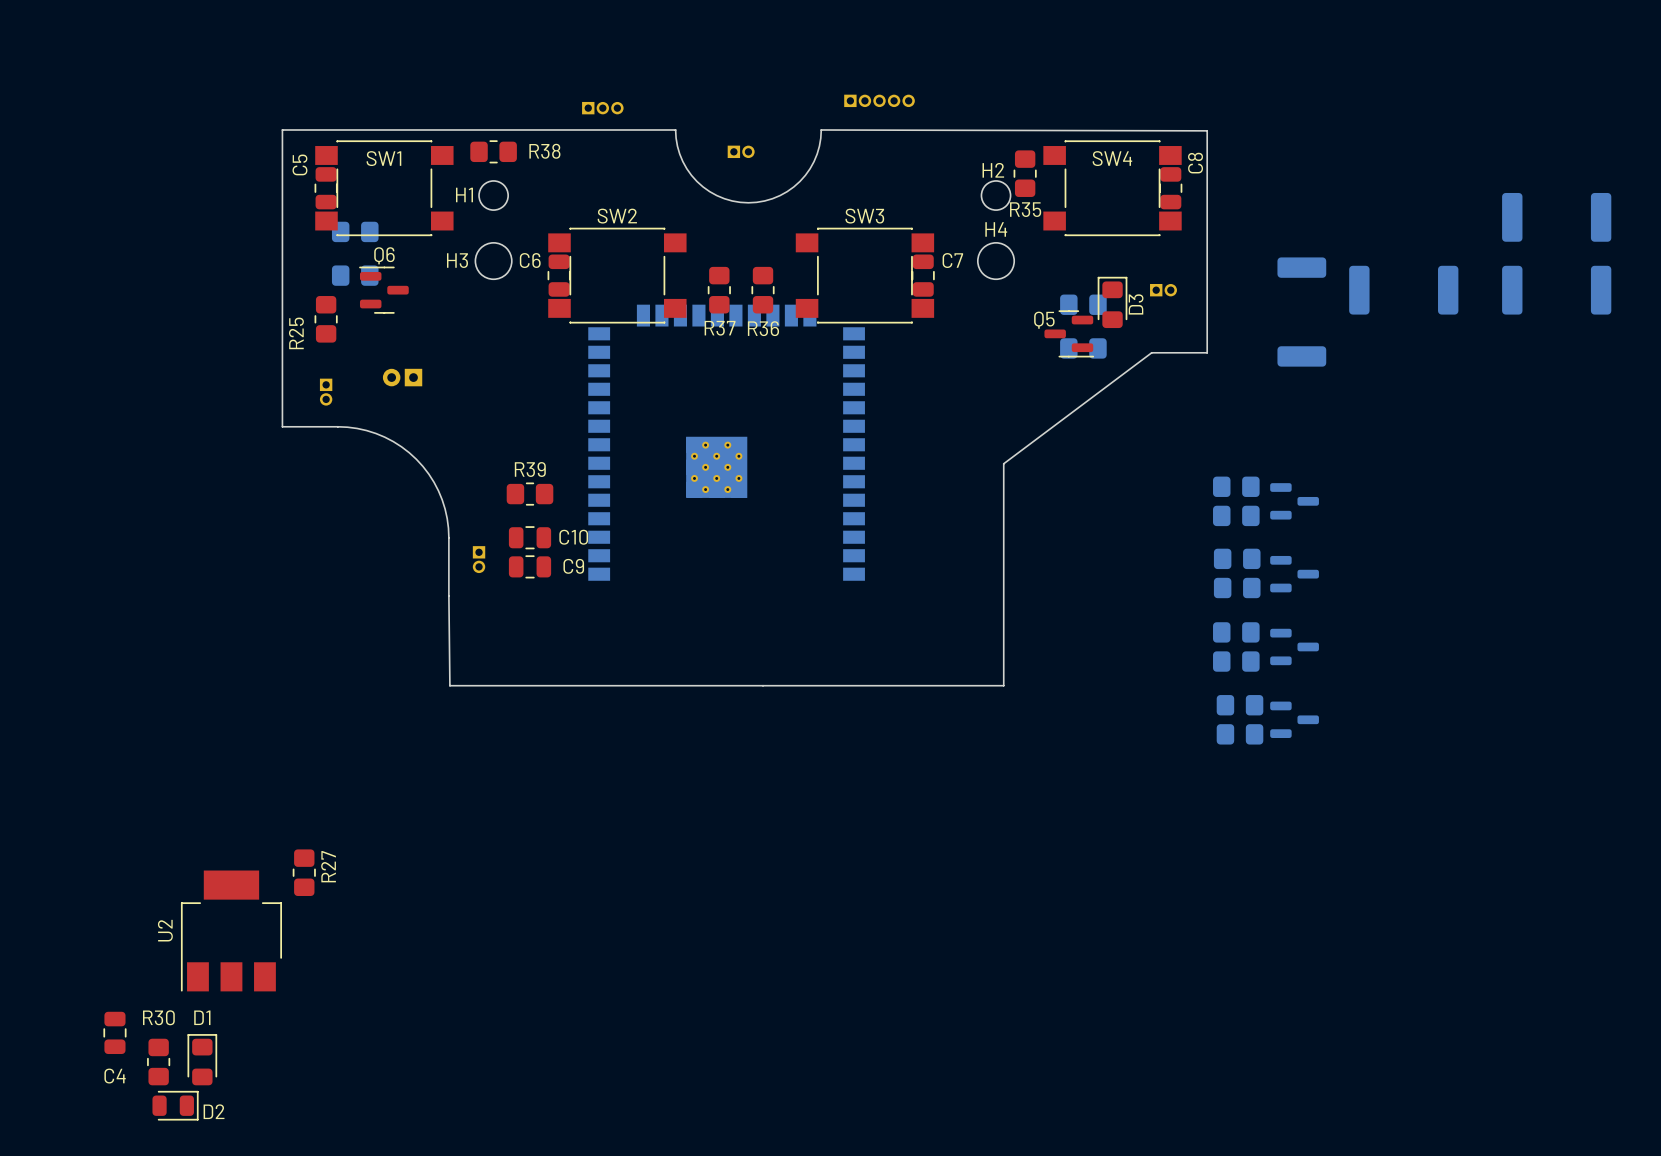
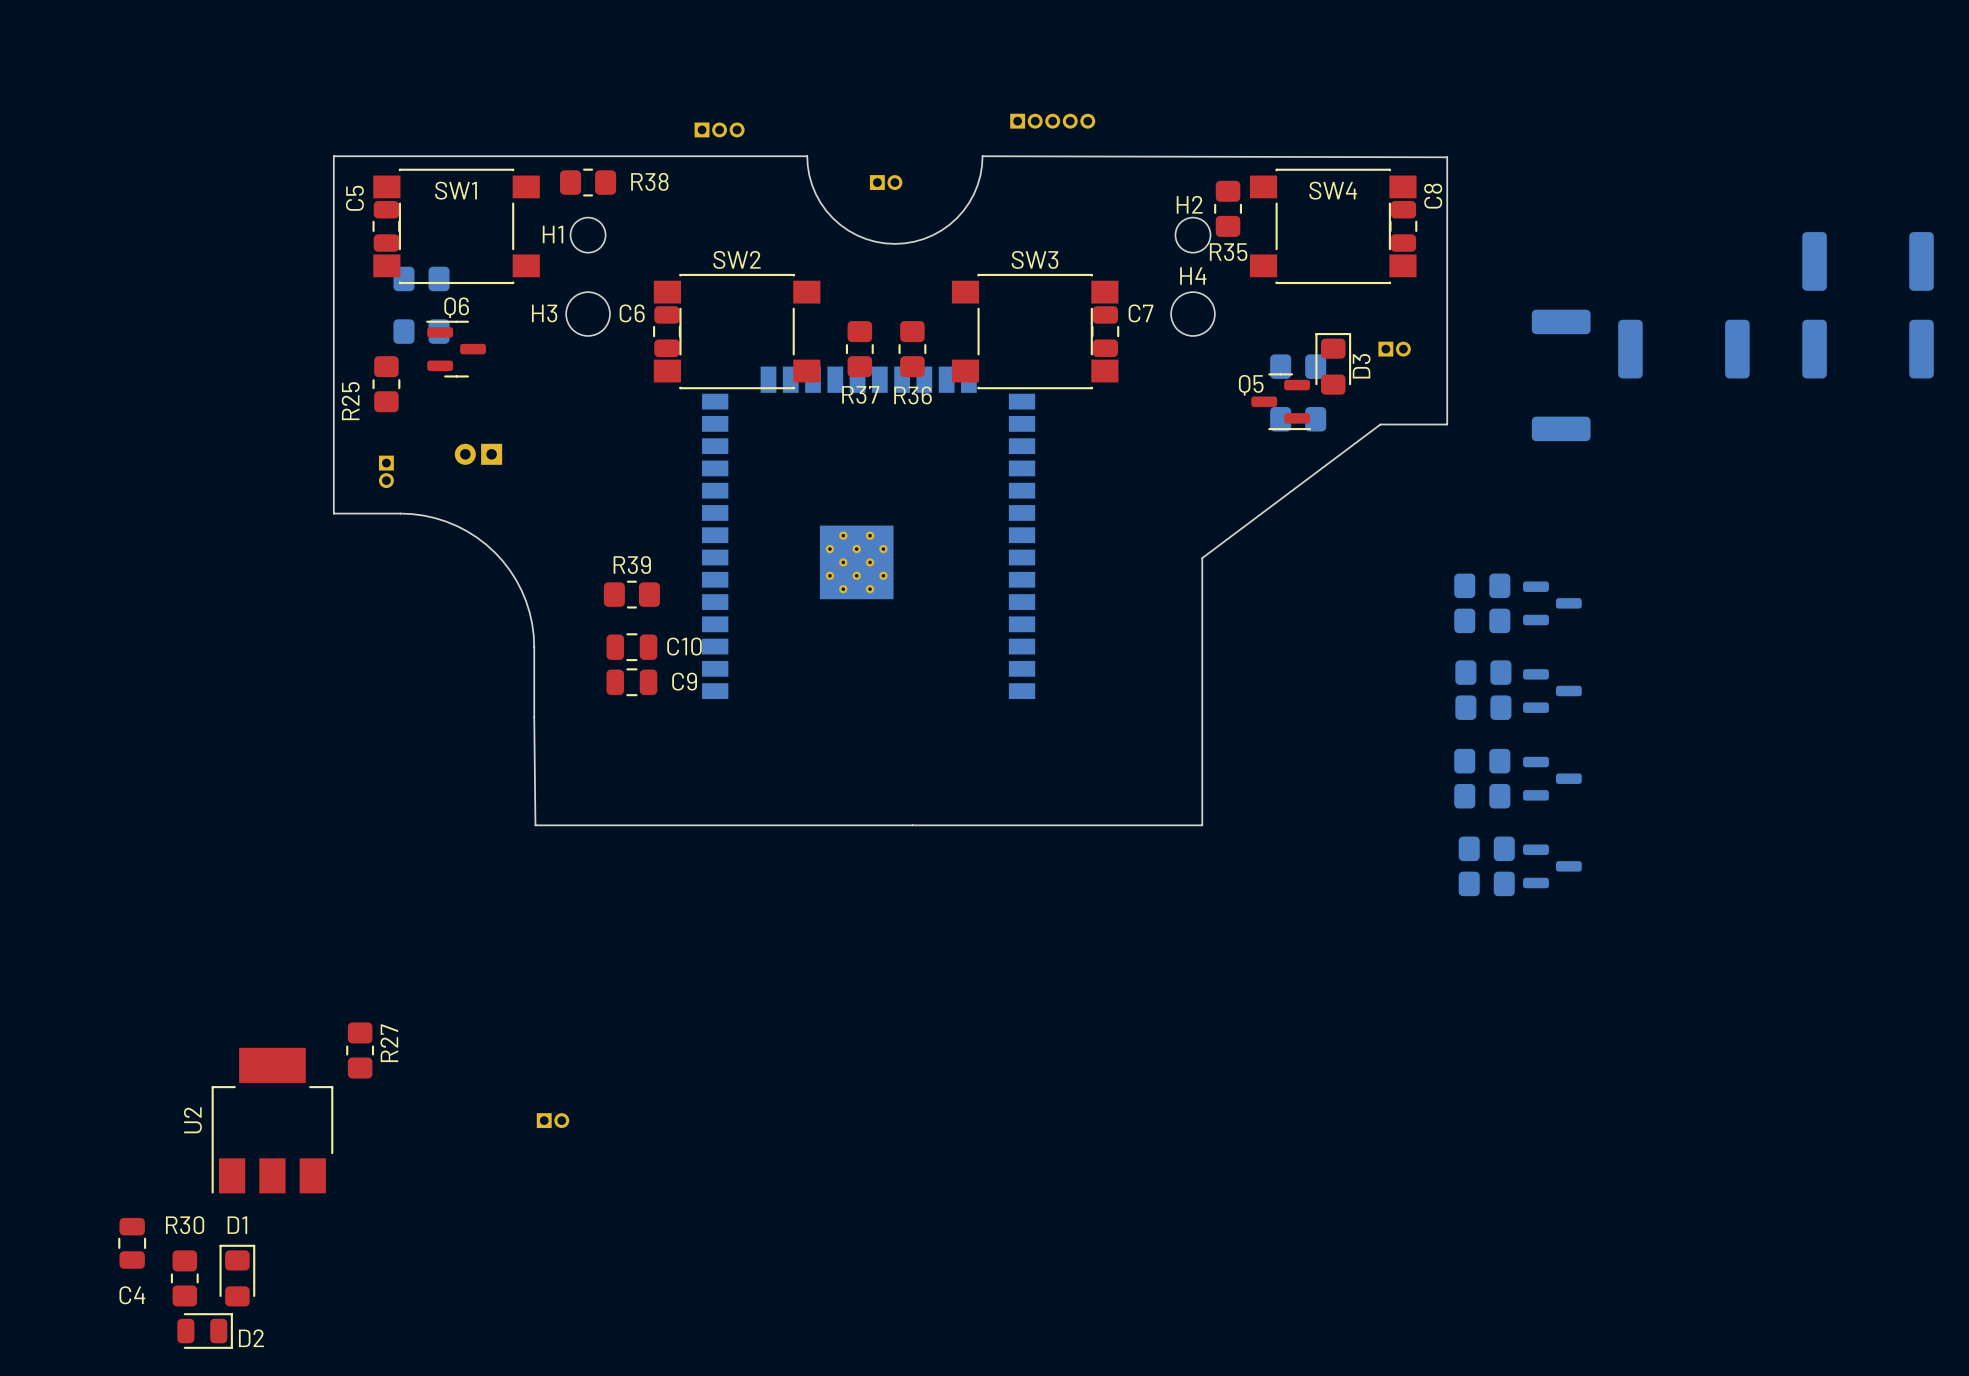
part: (479, 559) -> none
part: none -> (553, 1120)

